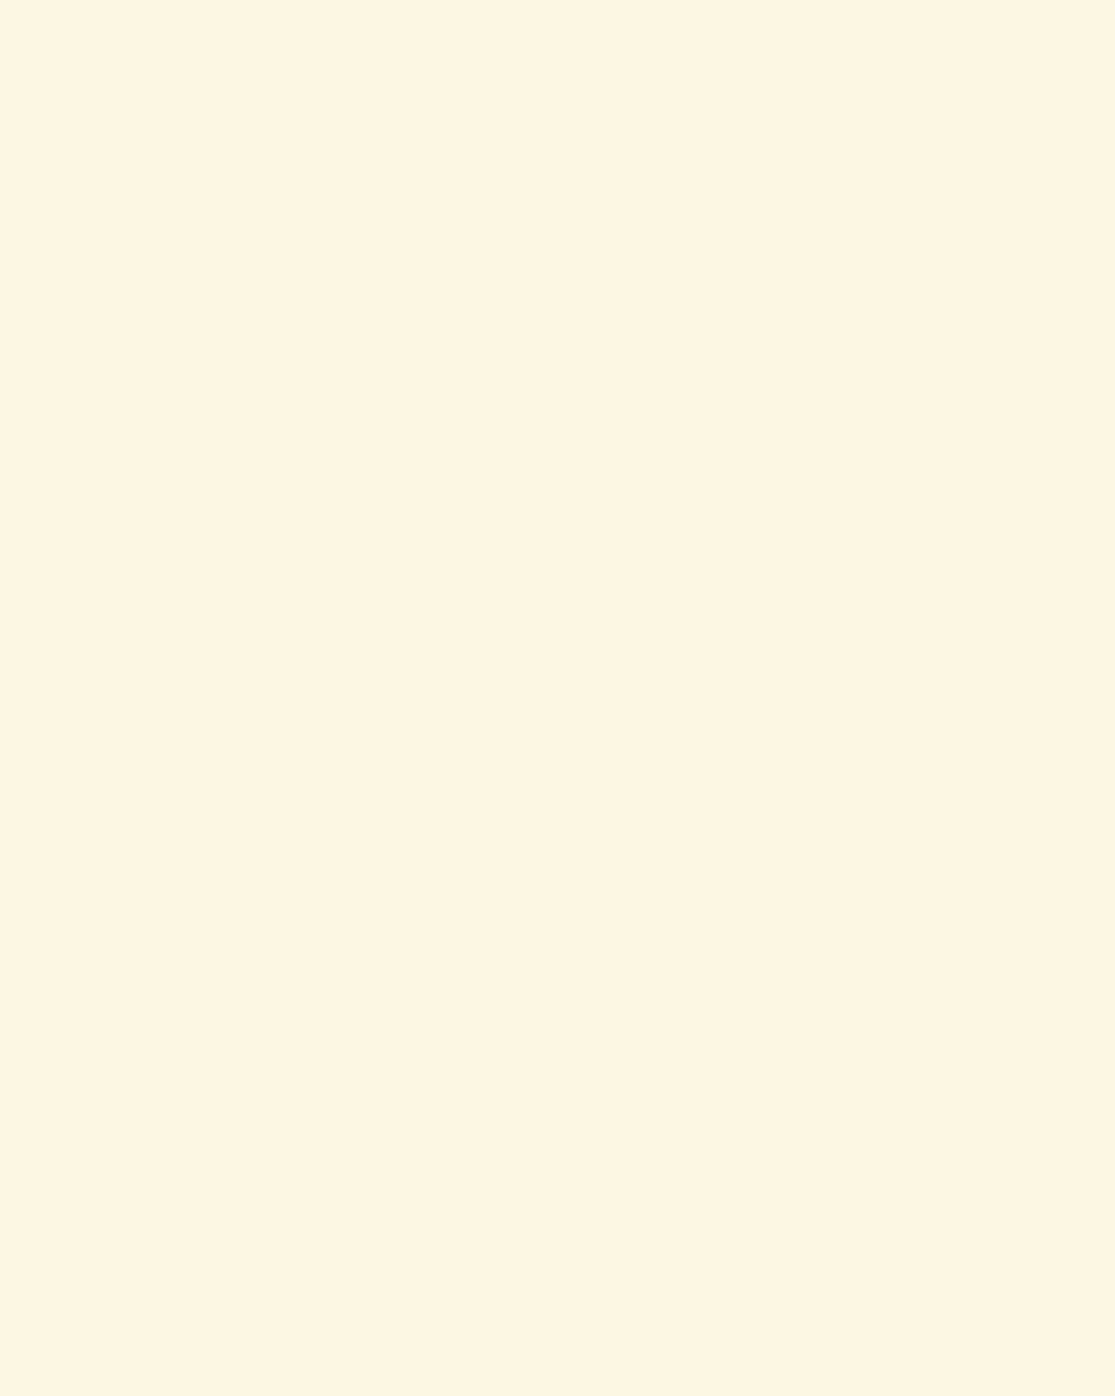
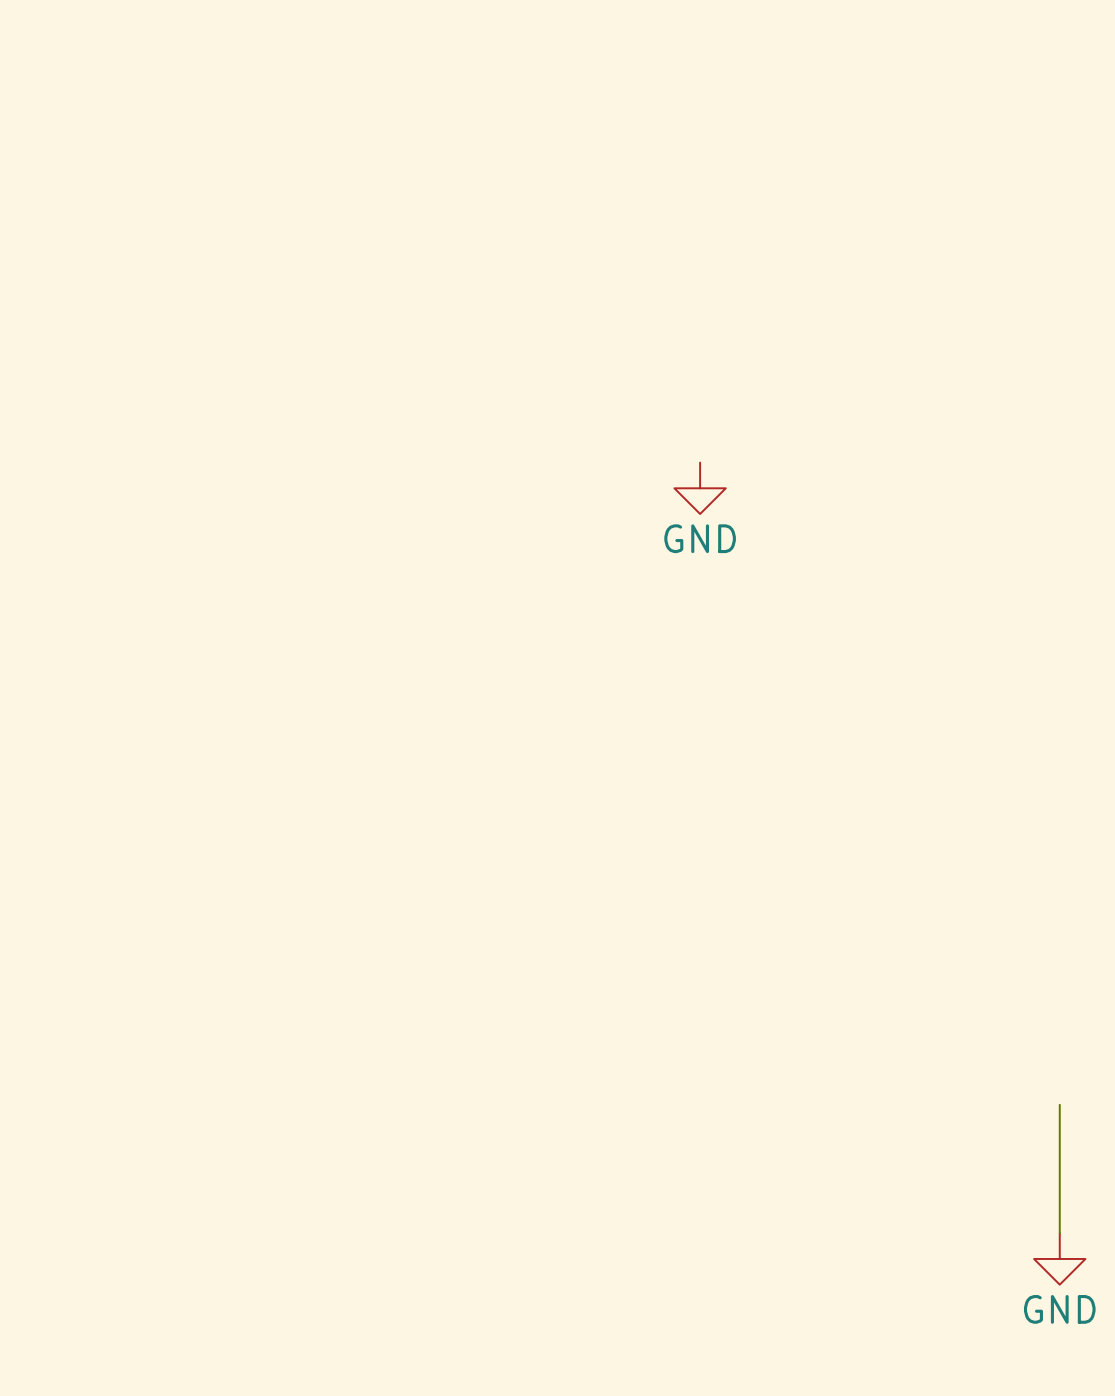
power symbol: none -> GND (700, 488)
wire: none -> (1059, 1104) (1059, 1233)
power symbol: none -> GND (1059, 1258)

